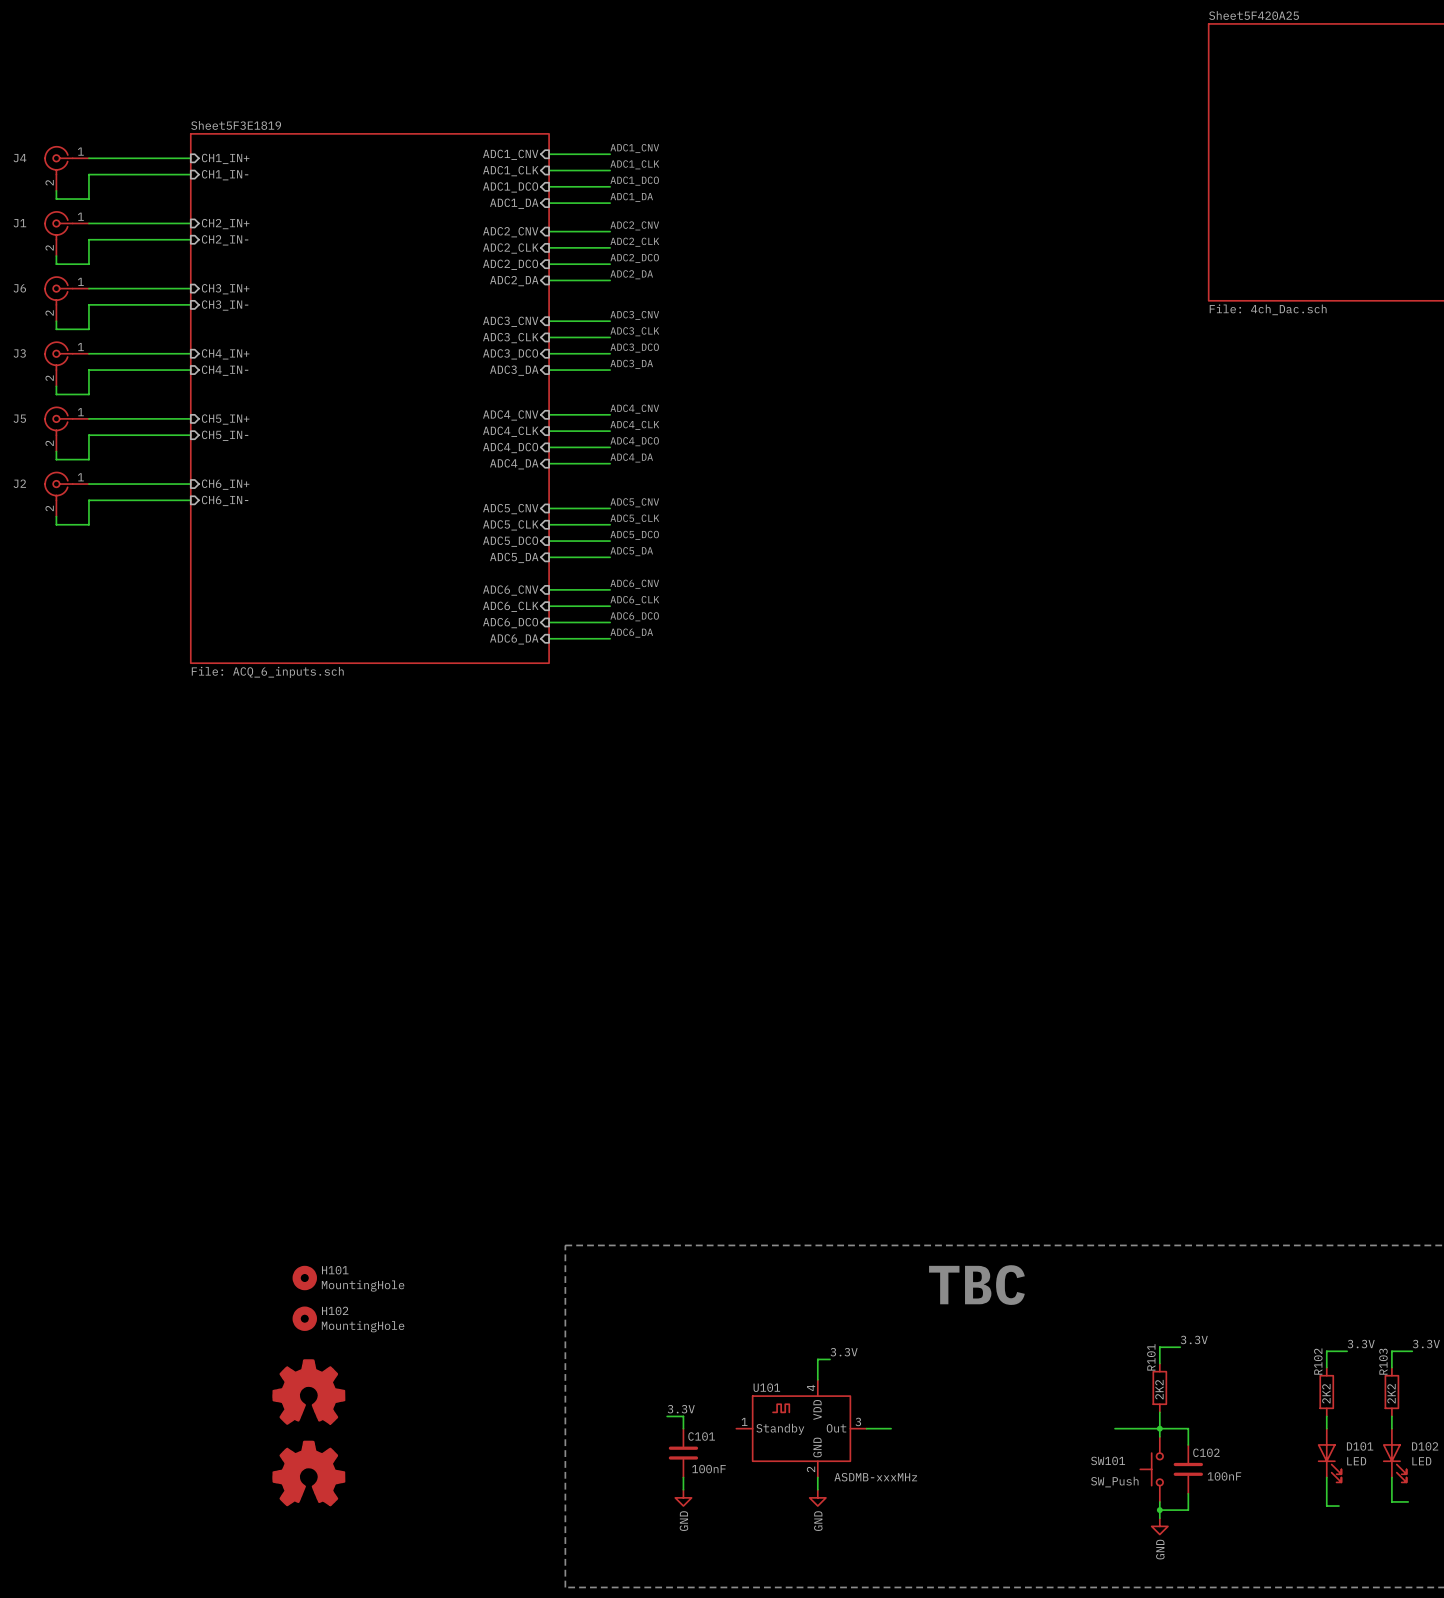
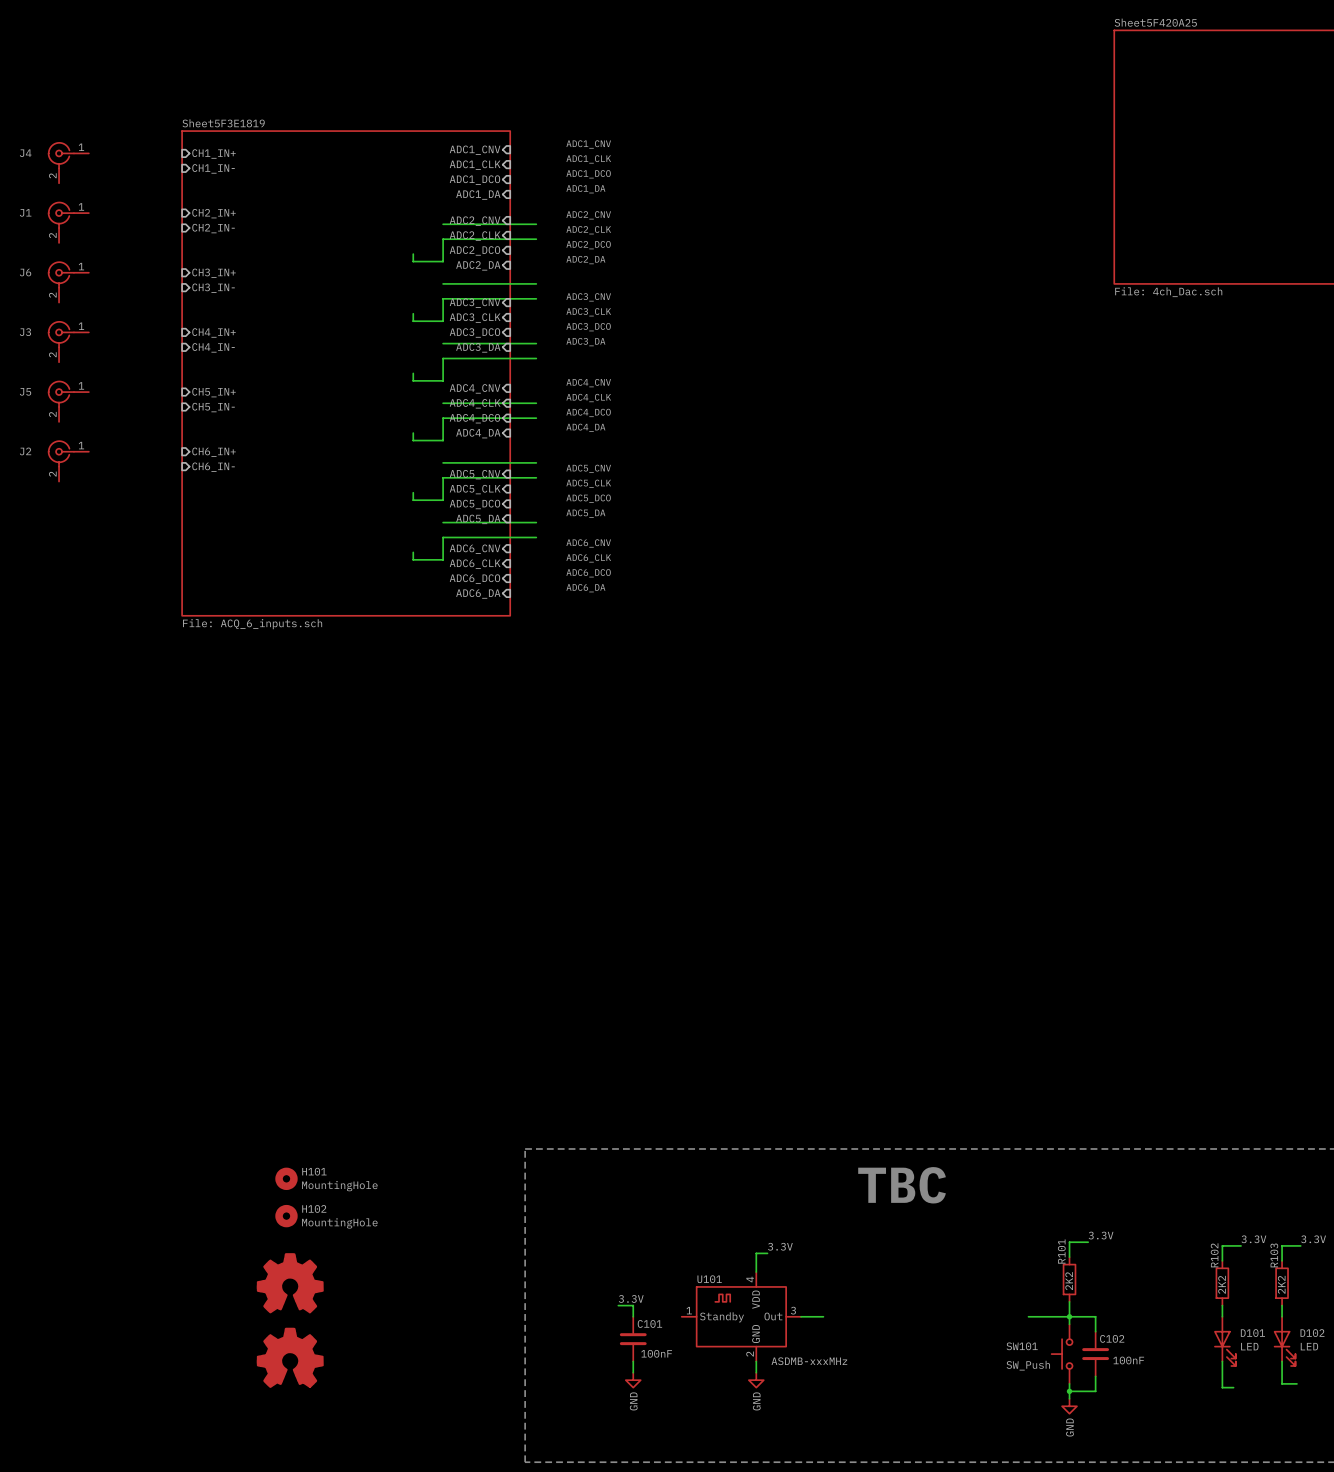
wire: (549, 154) (610, 154) -> none
wire: (88, 158) (190, 158) -> none
wire: (549, 170) (610, 170) -> none
wire: (190, 174) (88, 174) (88, 199) (56, 199) (56, 190) -> none
wire: (549, 186) (610, 186) -> none
wire: (549, 203) (610, 203) -> none
wire: (88, 223) (190, 223) -> none
wire: (549, 231) (610, 231) -> none
wire: none -> (443, 224) (536, 224)
wire: (190, 239) (88, 239) (88, 264) (56, 264) (56, 256) -> none
wire: (549, 247) (610, 247) -> none
wire: none -> (536, 239) (443, 239) (443, 261) (413, 261) (413, 254)
wire: (549, 264) (610, 264) -> none
wire: (549, 280) (610, 280) -> none
wire: (88, 288) (190, 288) -> none
wire: none -> (443, 283) (536, 283)
wire: (190, 304) (88, 304) (88, 329) (56, 329) (56, 321) -> none
wire: none -> (536, 298) (443, 298) (443, 321) (413, 321) (413, 313)
wire: (549, 321) (610, 321) -> none
wire: (549, 337) (610, 337) -> none
wire: (88, 353) (190, 353) -> none
wire: (549, 353) (610, 353) -> none
wire: none -> (443, 343) (536, 343)
wire: (190, 370) (88, 370) (88, 394) (56, 394) (56, 386) -> none
wire: (549, 370) (610, 370) -> none
wire: none -> (536, 358) (443, 358) (443, 380) (413, 380) (413, 373)
wire: (549, 414) (610, 414) -> none
wire: (88, 418) (190, 418) -> none
wire: none -> (443, 403) (510, 403)
wire: (577, 431) (610, 431) -> none
wire: (190, 435) (88, 435) (88, 459) (56, 459) (56, 451) -> none
wire: none -> (510, 418) (443, 418) (443, 440) (413, 440) (413, 433)
wire: (577, 447) (610, 447) -> none
wire: (549, 463) (610, 463) -> none
wire: (88, 484) (190, 484) -> none
wire: none -> (443, 462) (536, 462)
wire: (190, 500) (88, 500) (88, 524) (56, 524) (56, 516) -> none
wire: (549, 508) (610, 508) -> none
wire: none -> (536, 477) (443, 477) (443, 500) (413, 500) (413, 492)
wire: (549, 524) (610, 524) -> none
wire: (549, 541) (610, 541) -> none
wire: (549, 557) (610, 557) -> none
wire: none -> (443, 522) (536, 522)
wire: none -> (536, 537) (443, 537) (443, 559) (413, 559) (413, 552)
wire: (549, 589) (610, 589) -> none
wire: (549, 606) (610, 606) -> none
wire: (549, 622) (610, 622) -> none
wire: (549, 638) (610, 638) -> none

